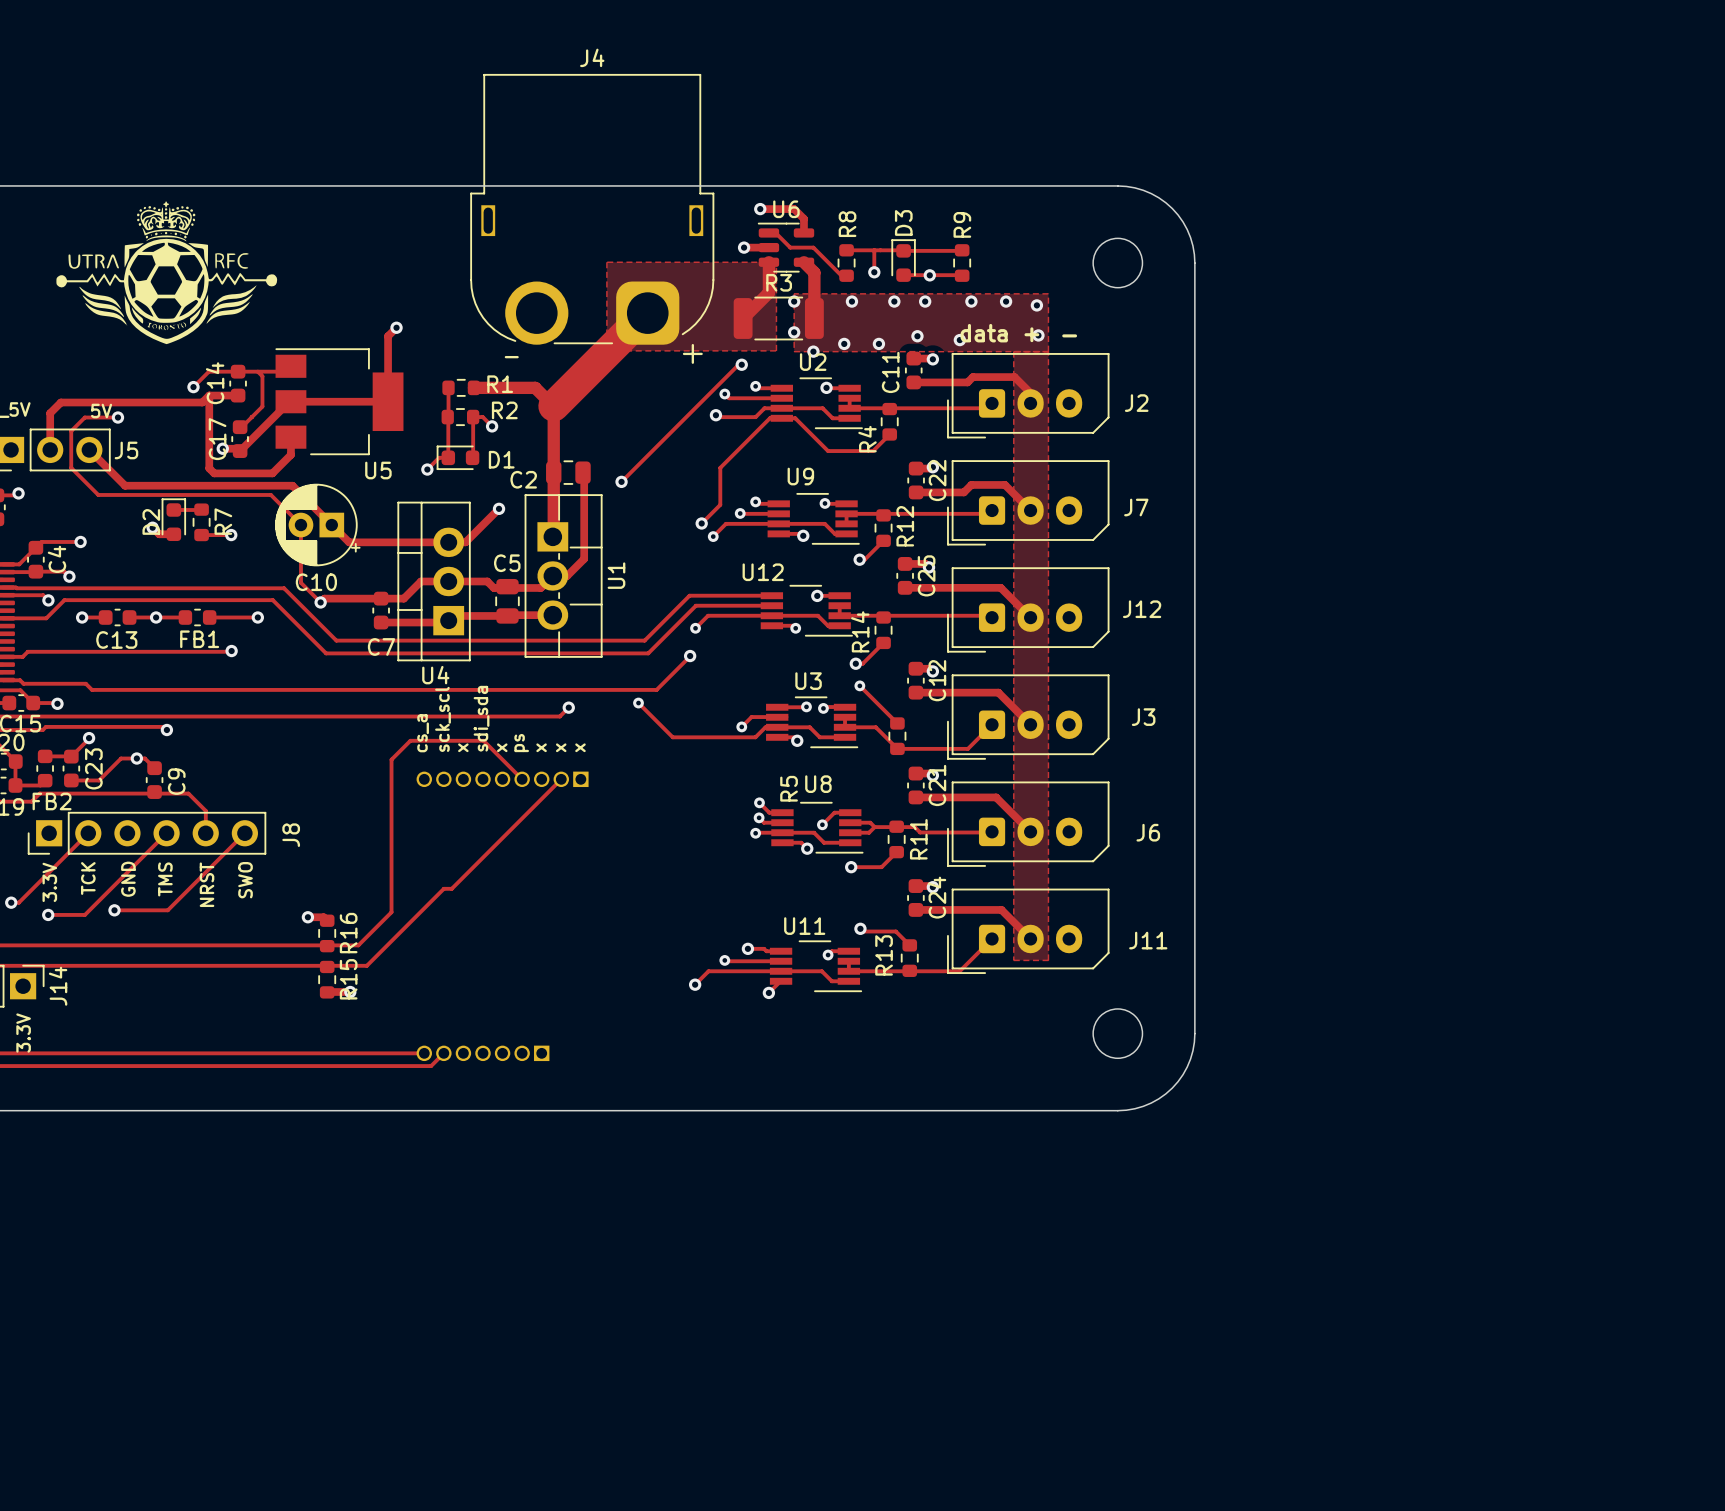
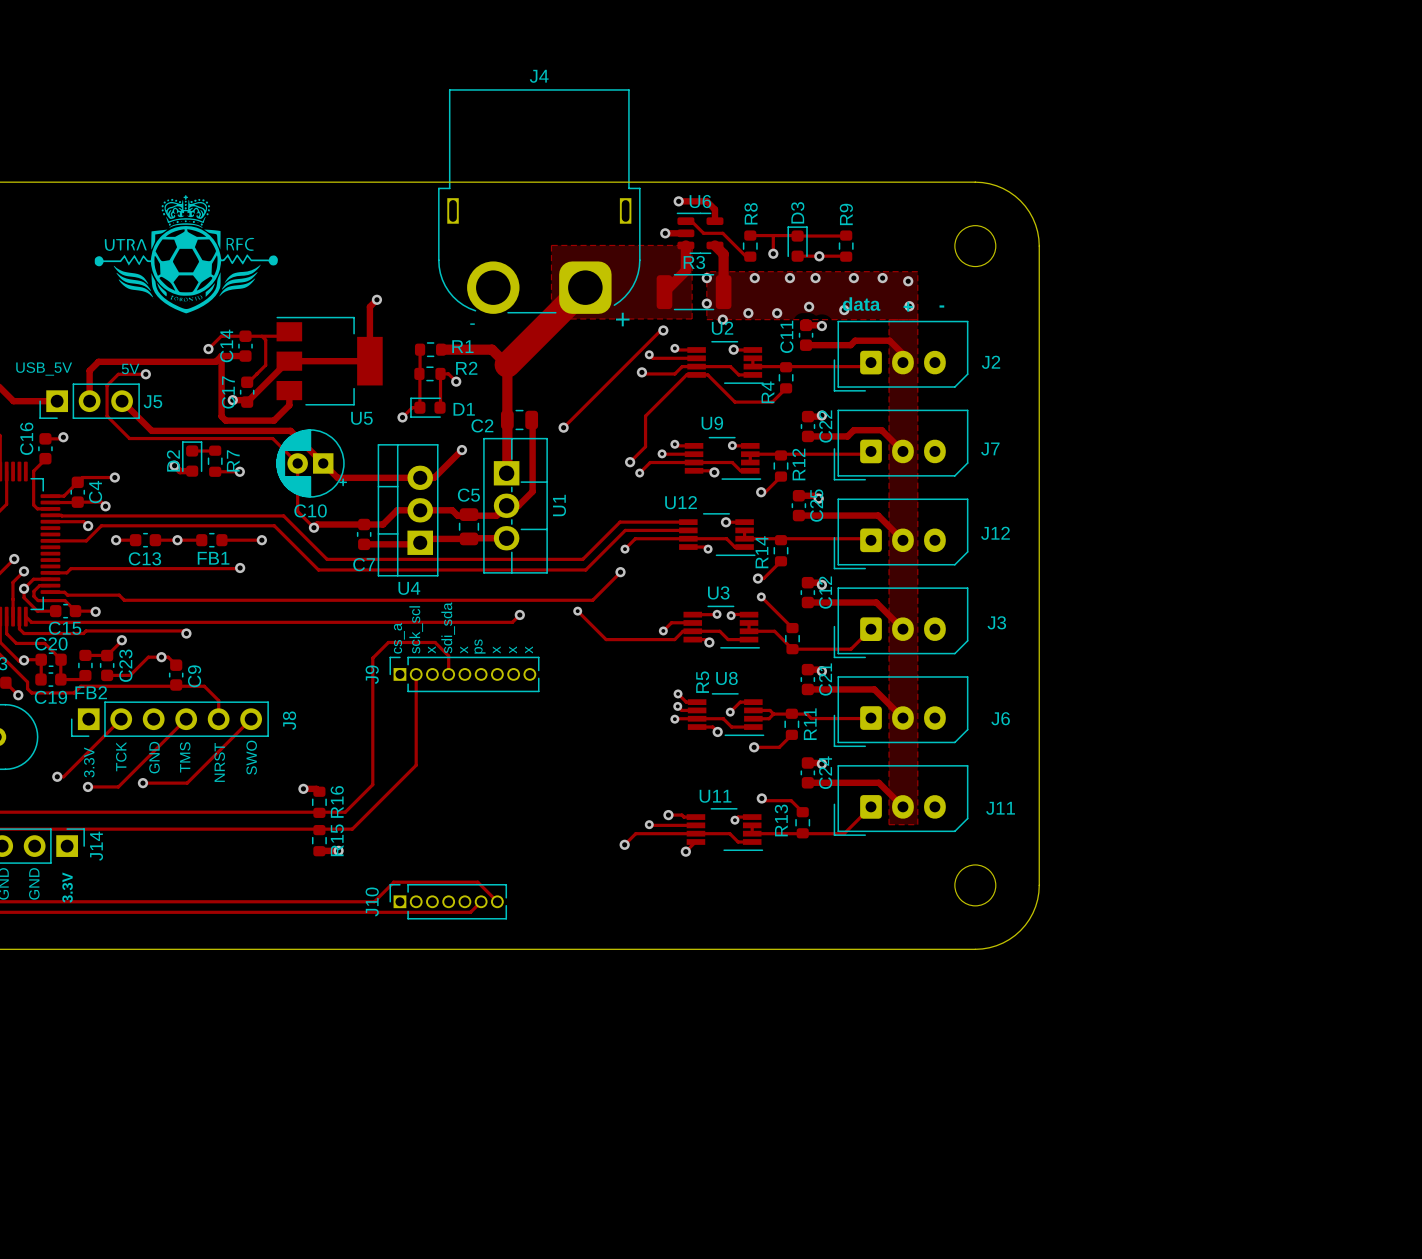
track: (466, 740) (483, 740) (522, 779) -> (435, 642) (448, 656) (448, 674)
J9 side: bottom (502, 779) -> top (464, 674)
track: (561, 779) (451, 888) (443, 888) -> (416, 674) (416, 765)
track: (393, 1053) (424, 1053) -> (374, 901) (393, 882) (477, 882) (497, 901)
track: (443, 1053) (431, 1066) -> (481, 901) (470, 912) (405, 912)
J10 side: bottom (483, 1053) -> top (448, 901)

